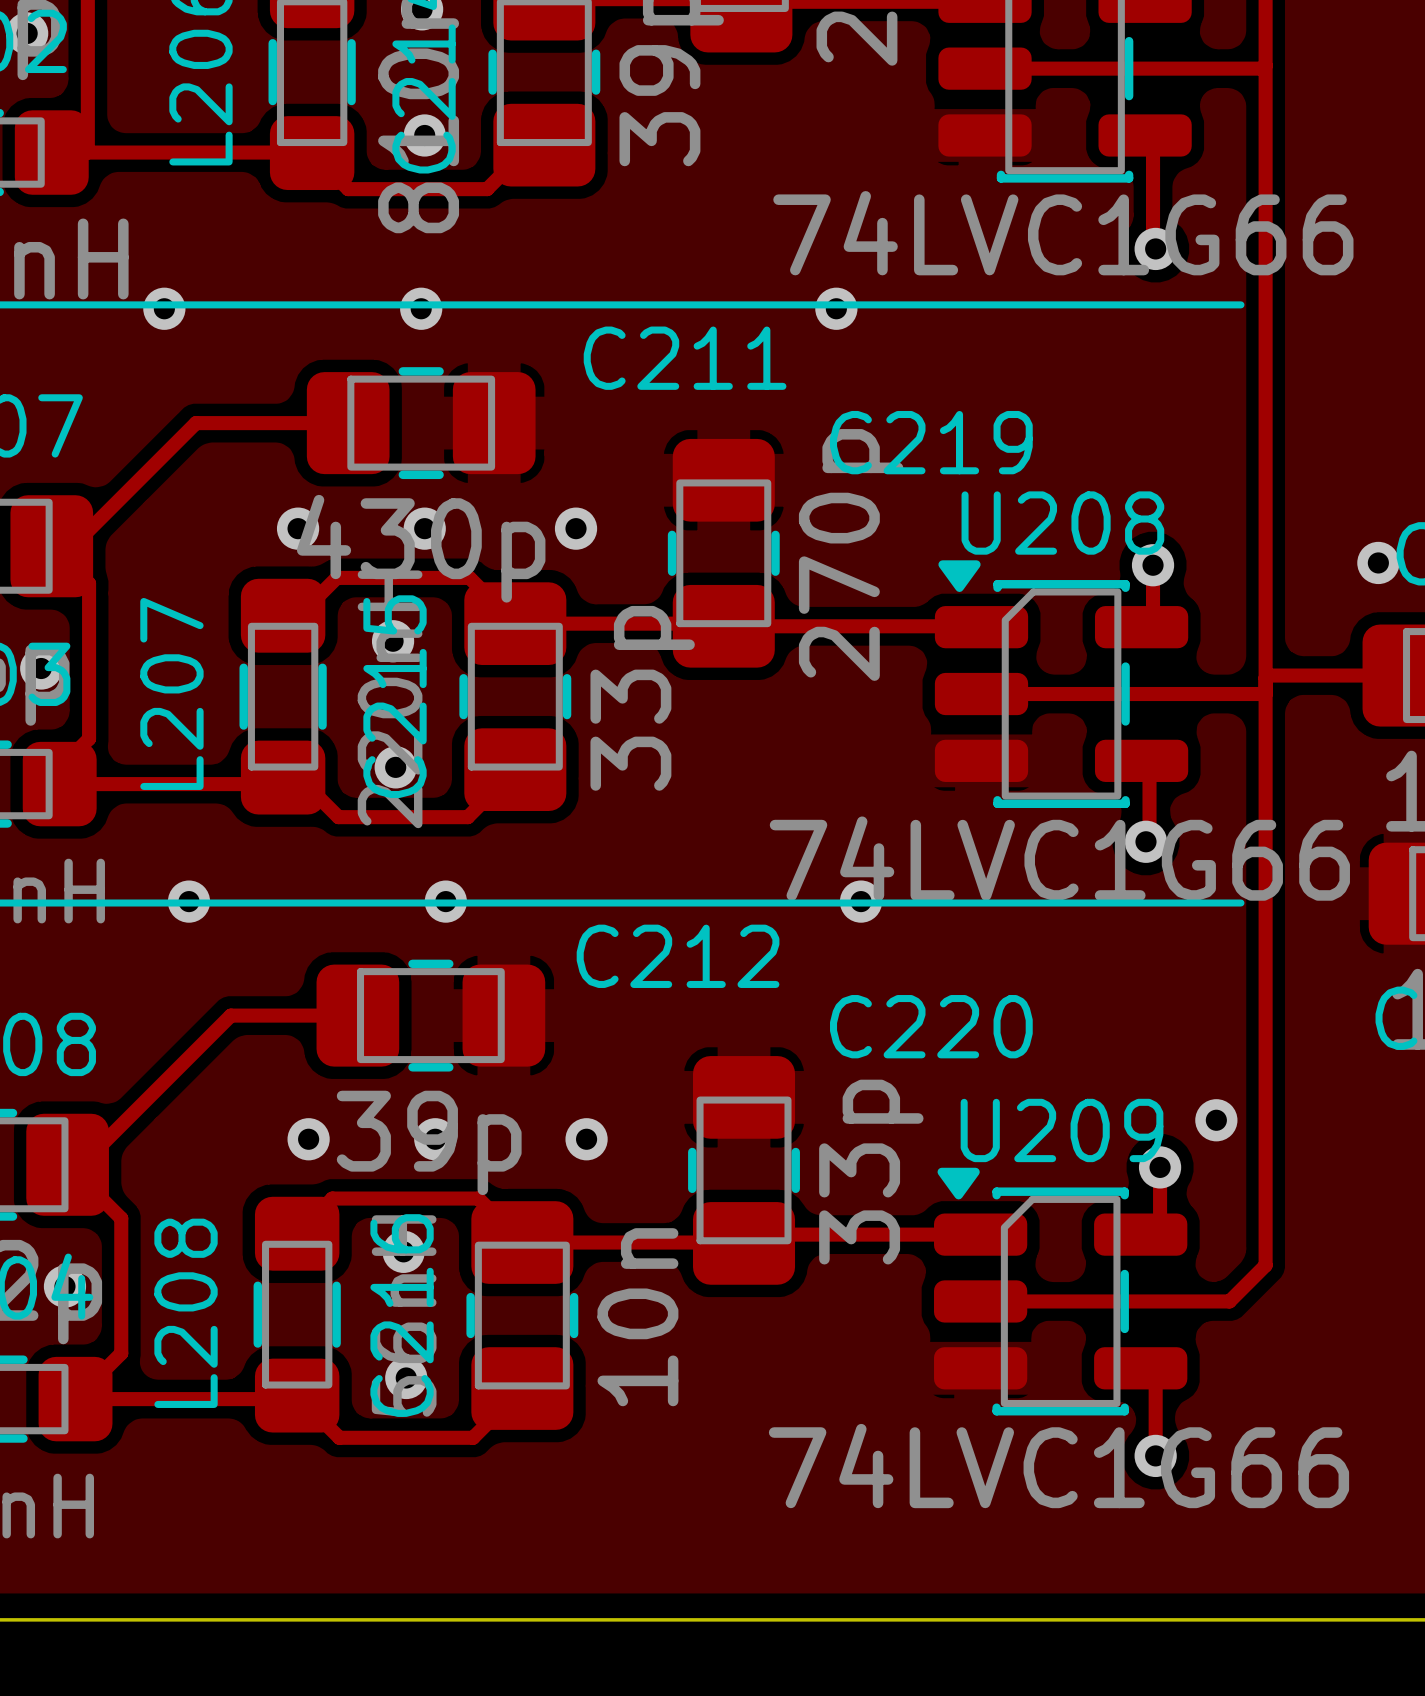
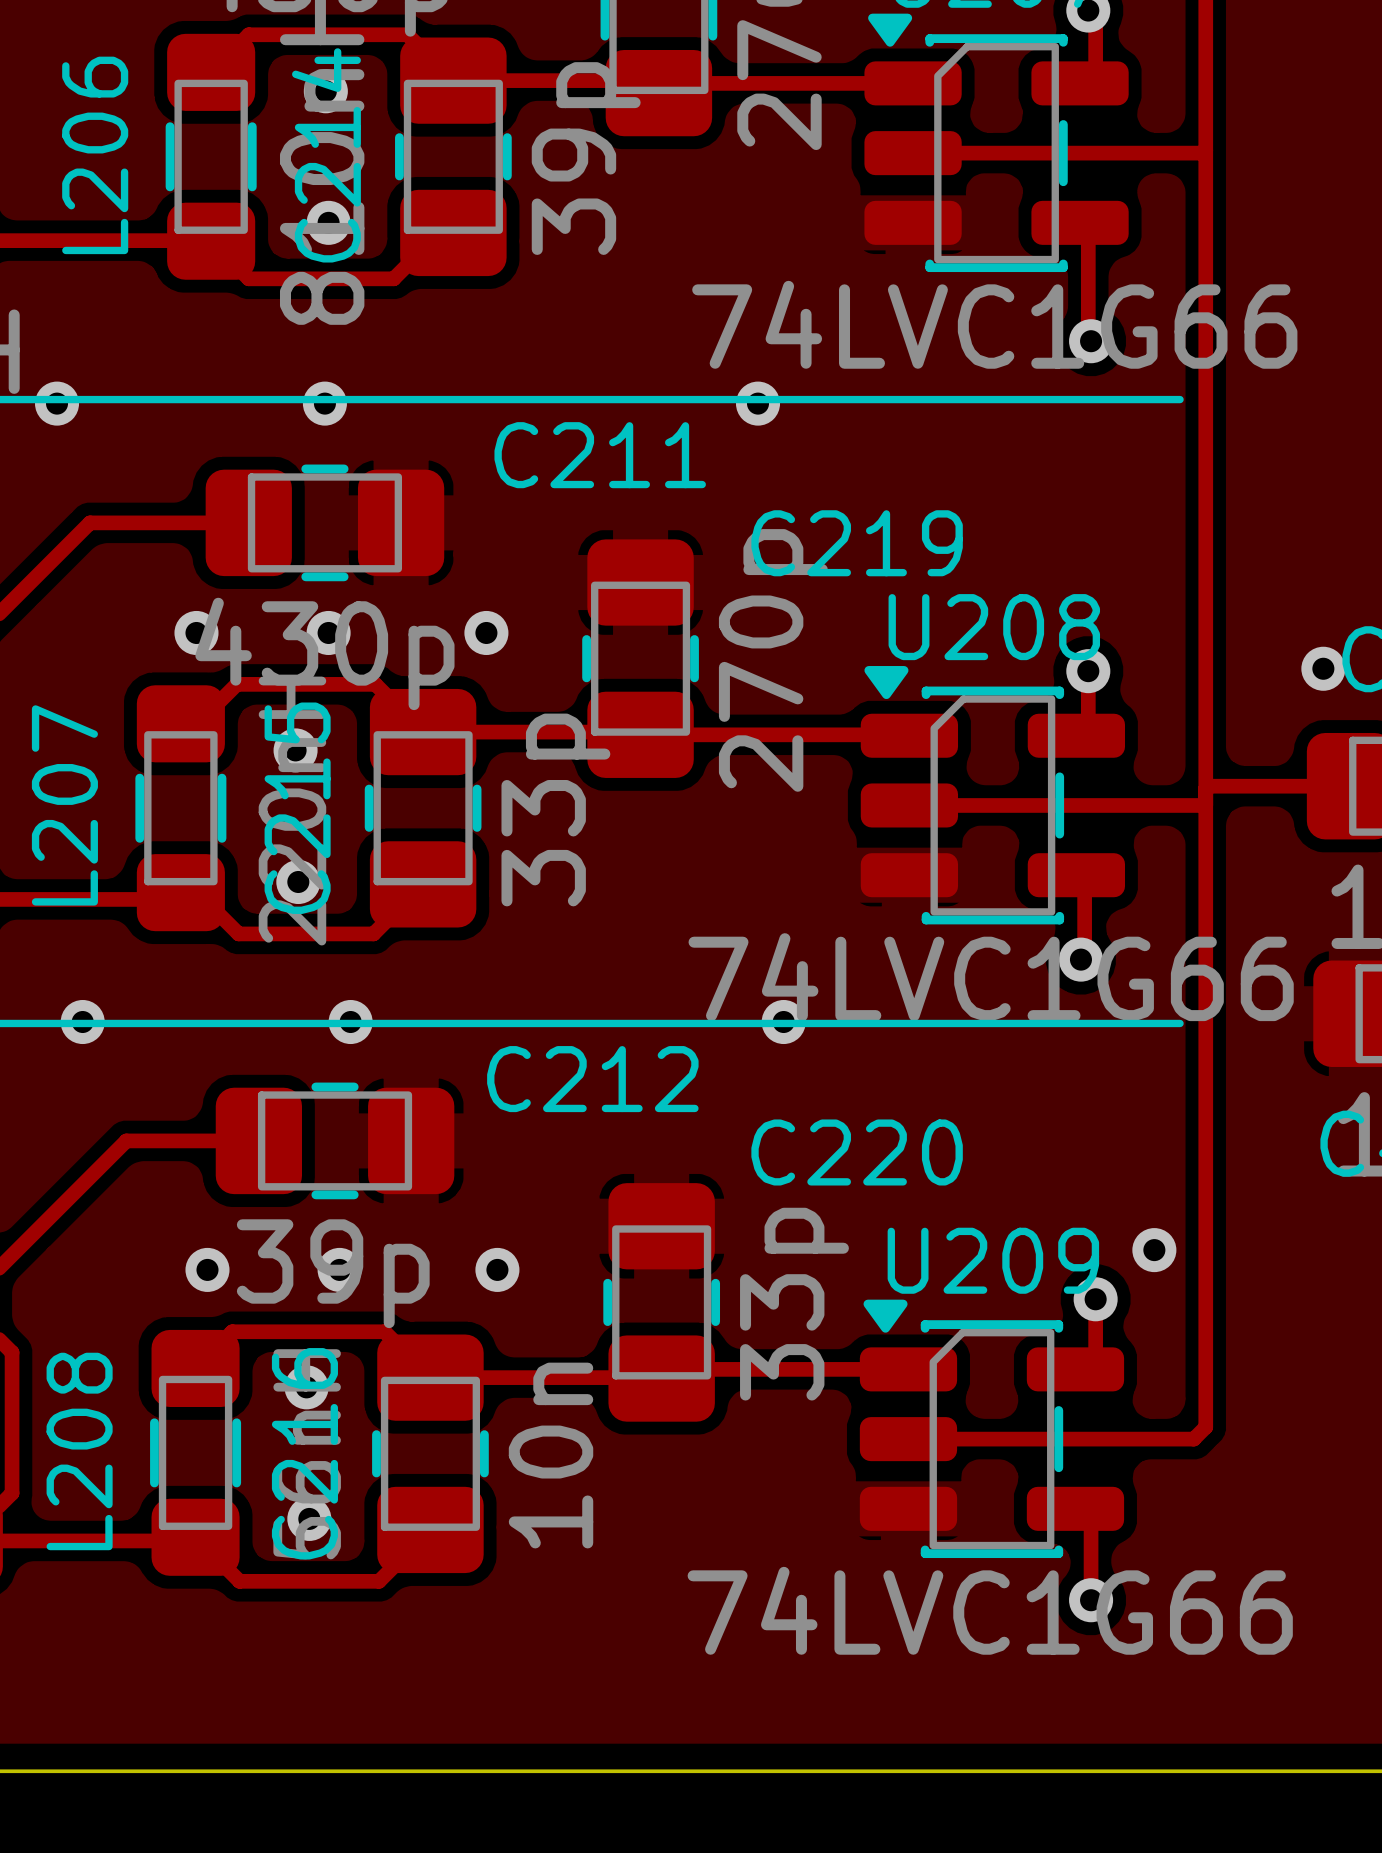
track: (1265, 1265) (1229, 1301) -> (1205, 1401) (1205, 1427) (1193, 1439) (1168, 1439)

